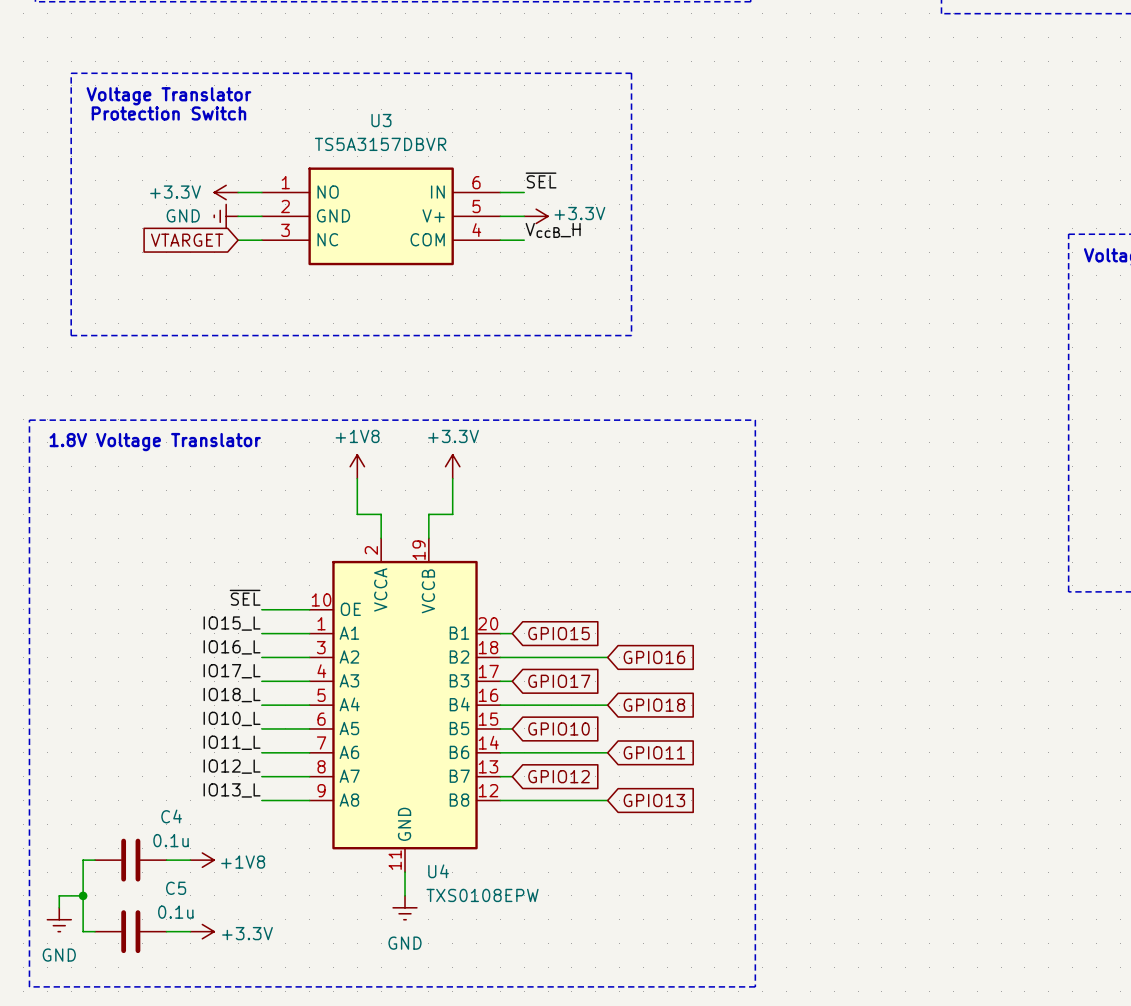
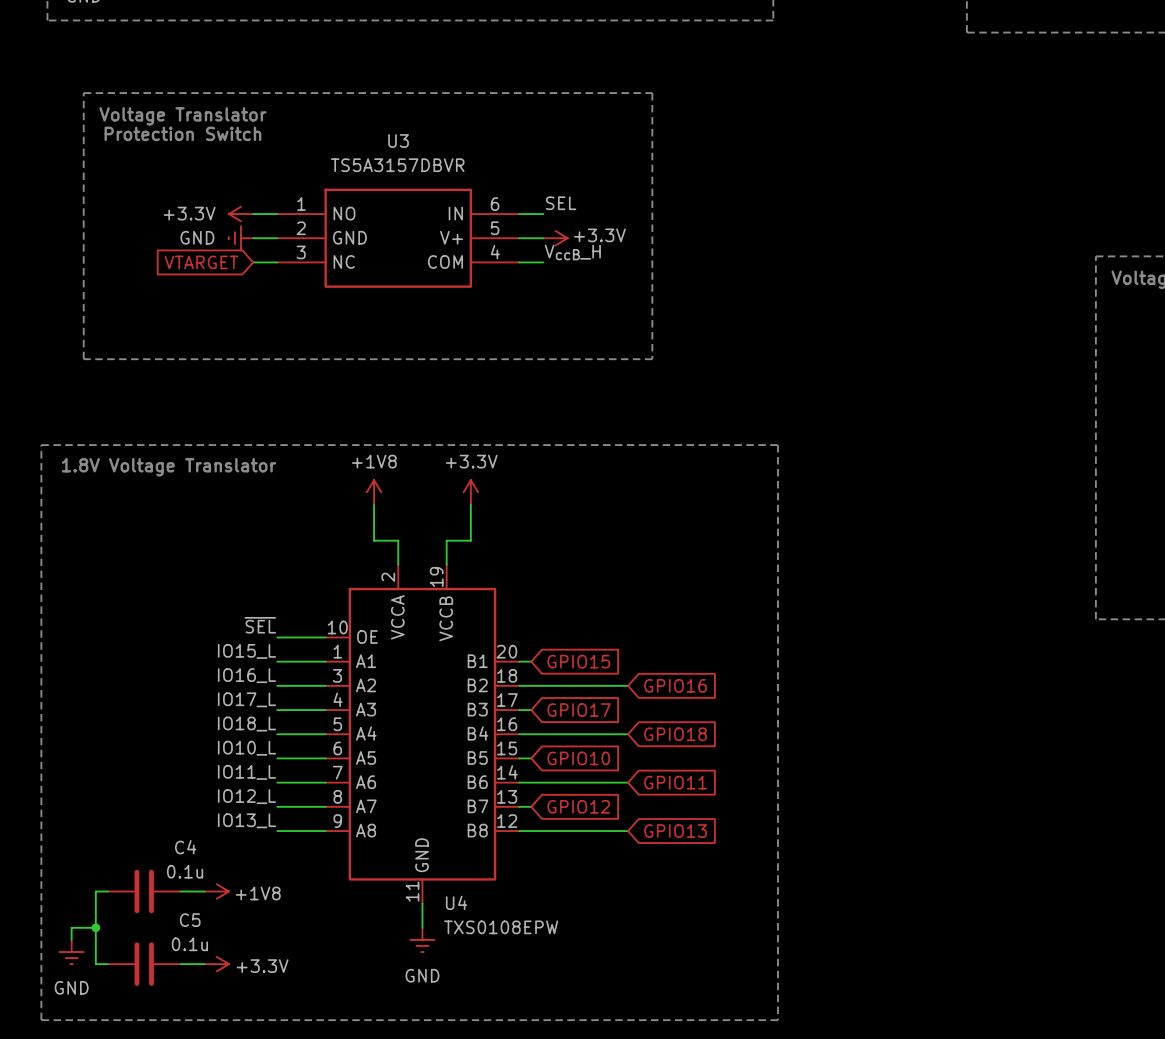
label: ~{SEL} (541, 180) -> SEL (561, 203)

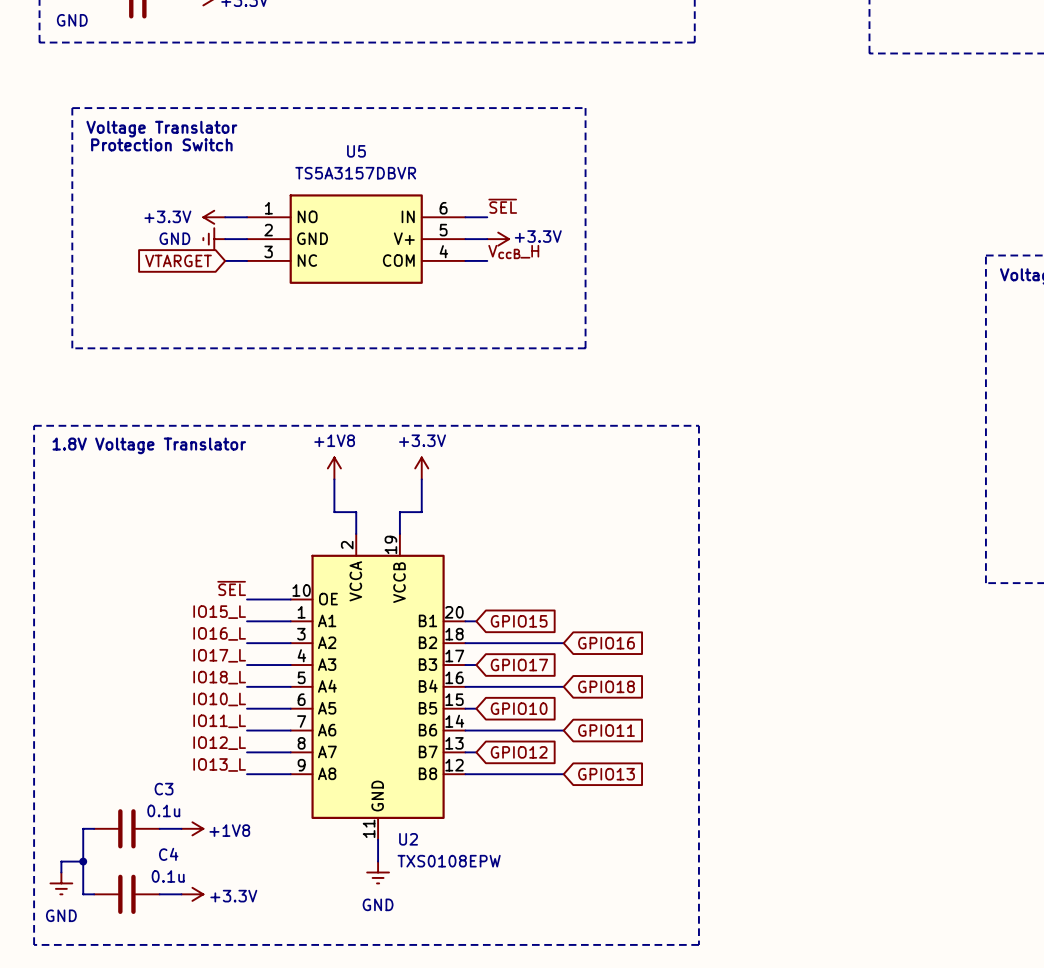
U3 name: U3 (398, 141) -> U5 (356, 151)
label: SEL (561, 203) -> ~{SEL} (502, 206)
C4 name: C4 (185, 847) -> C3 (164, 789)
U4 name: U4 (456, 902) -> U2 (408, 839)
C5 name: C5 (190, 920) -> C4 (168, 854)

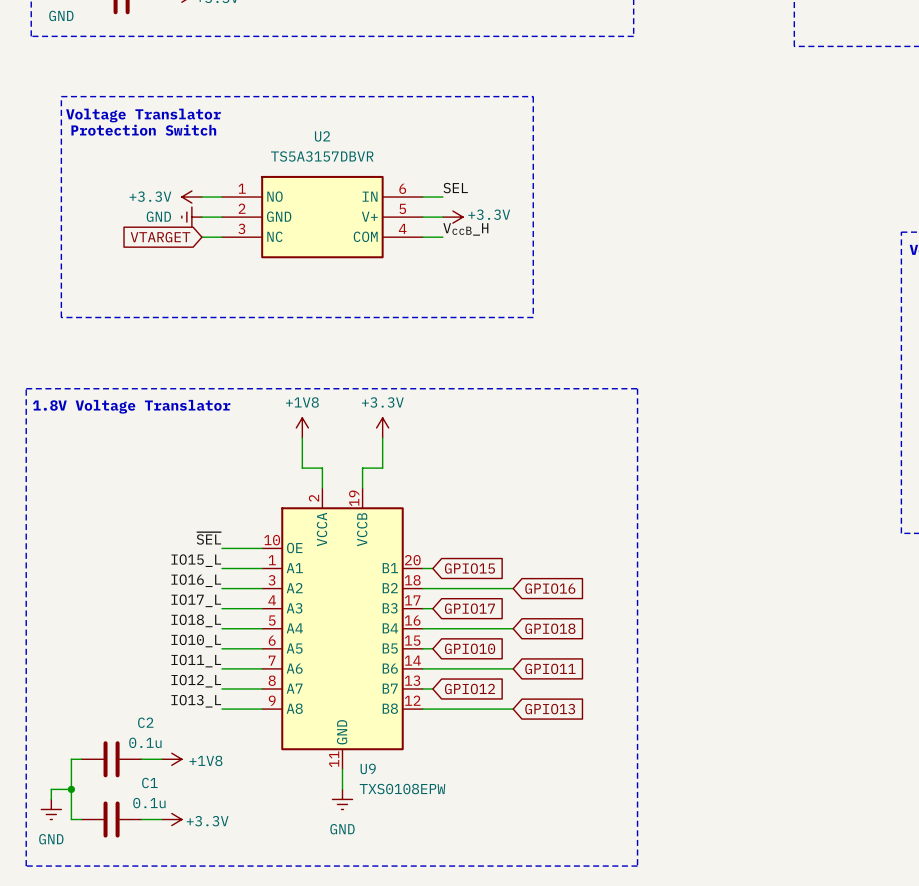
U5 name: U5 (356, 151) -> U2 (322, 136)
label: ~{SEL} (502, 206) -> SEL (455, 188)
C3 name: C3 (164, 789) -> C2 (145, 722)
U2 name: U2 (408, 839) -> U9 (368, 768)
C4 name: C4 (168, 854) -> C1 (149, 783)

